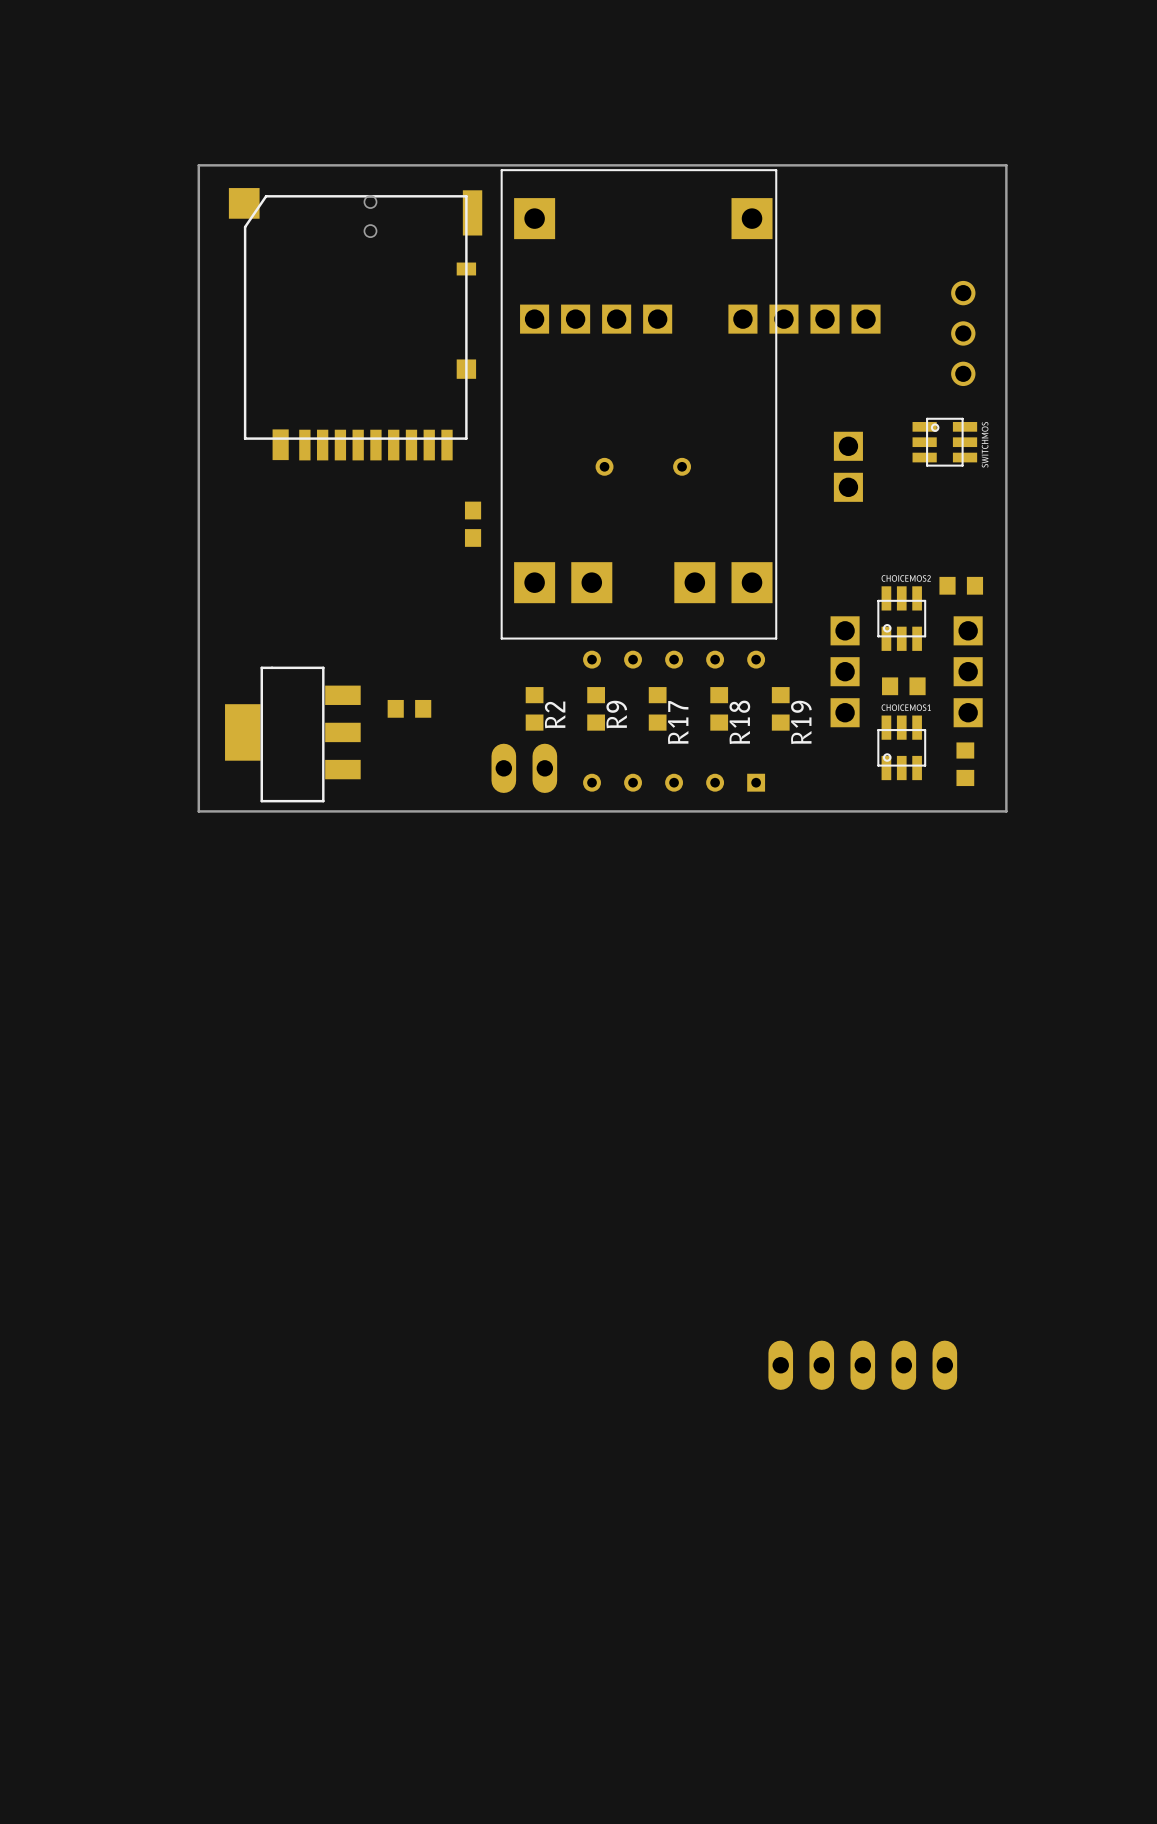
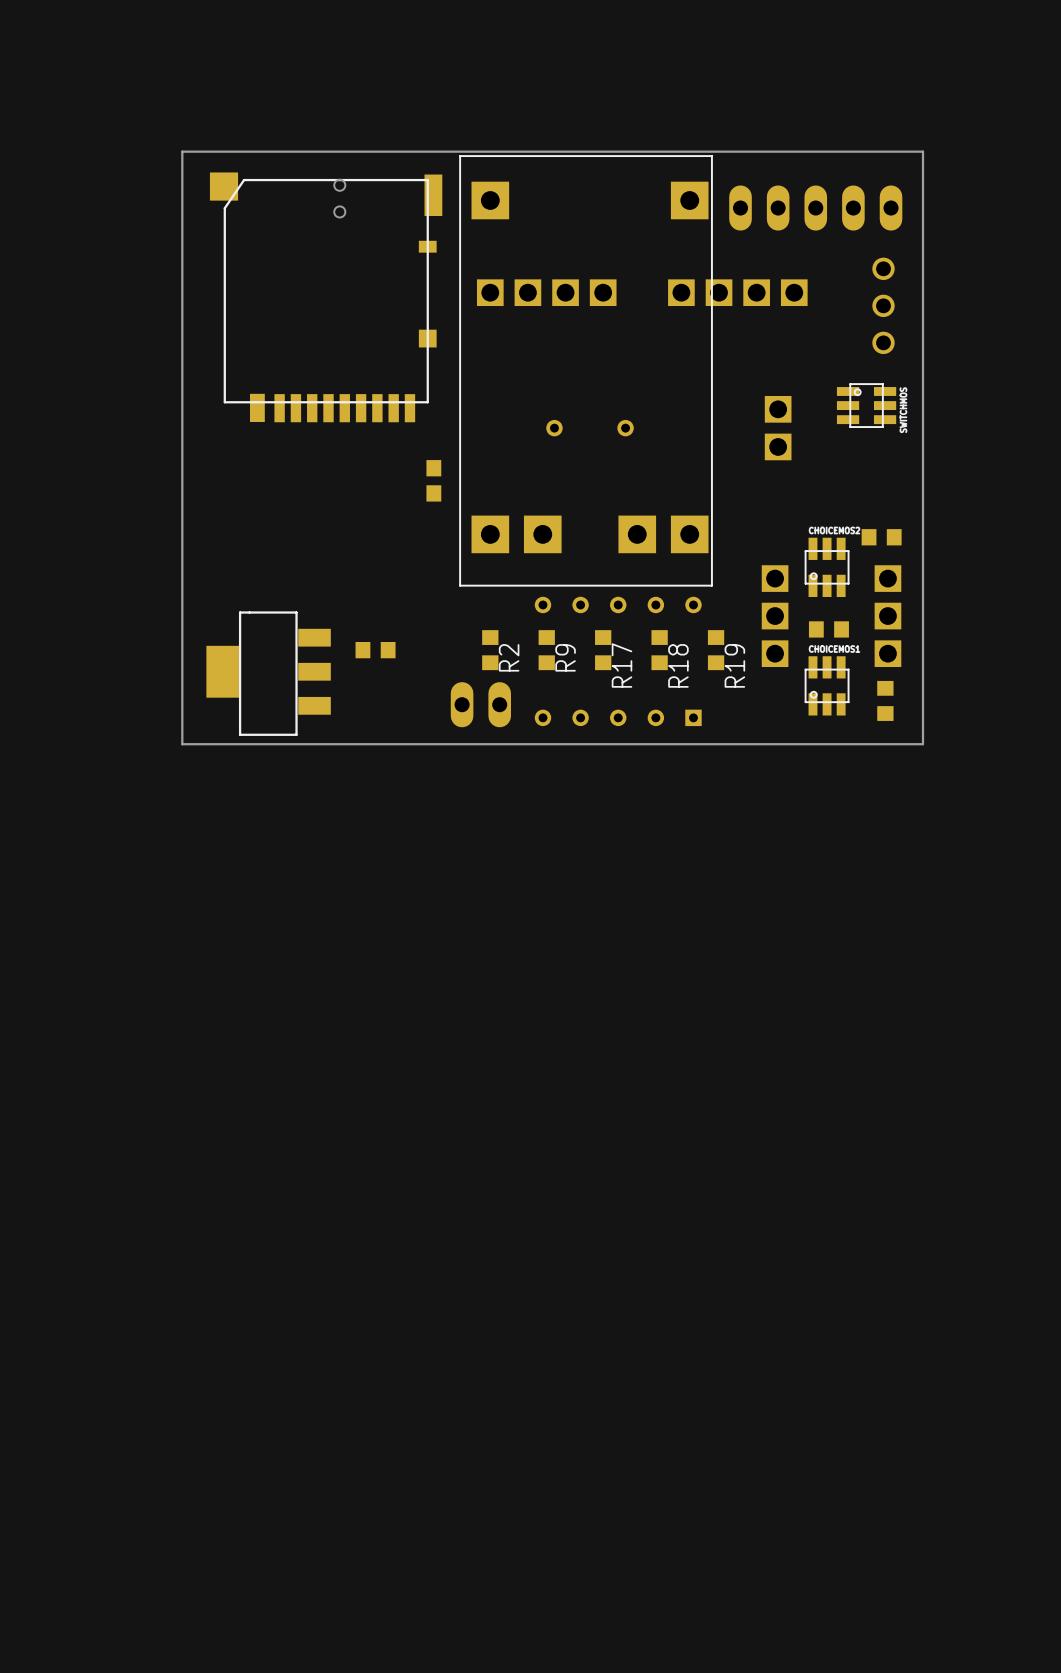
part: none -> (815, 208)
part: (862, 1365) -> none

